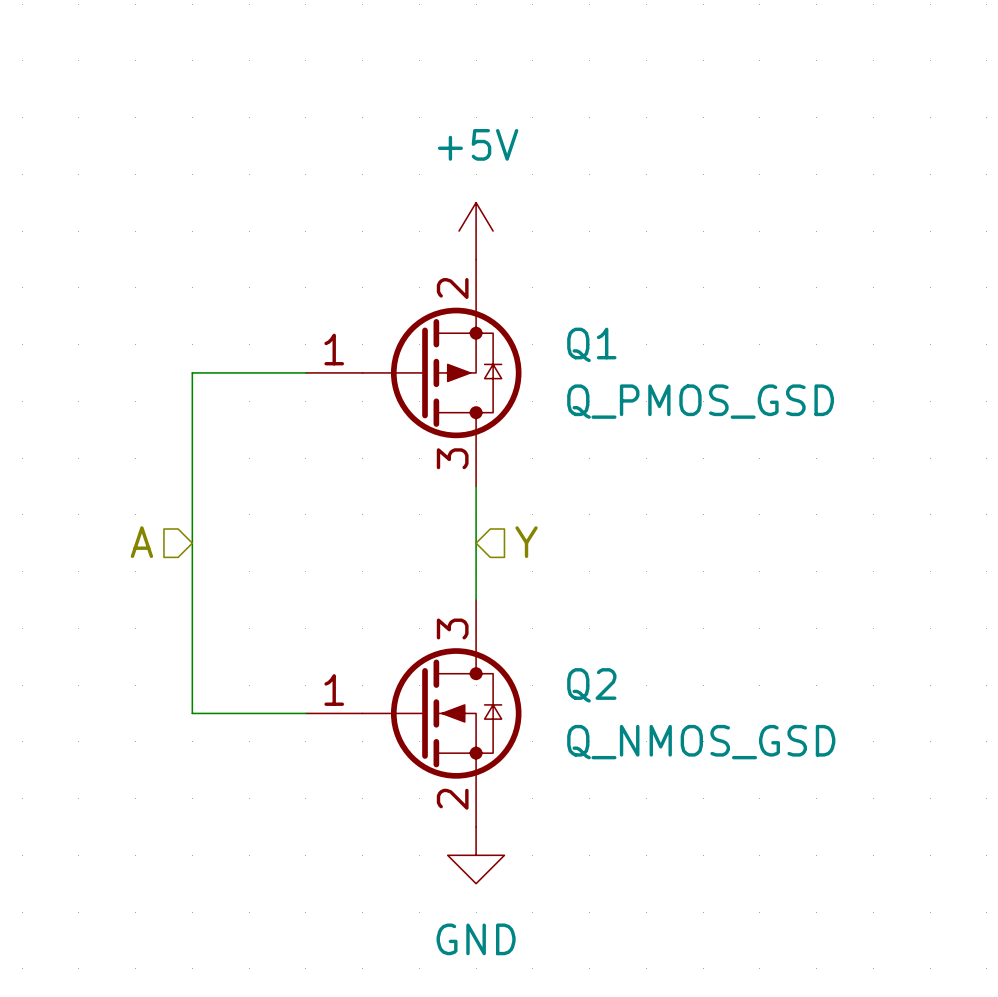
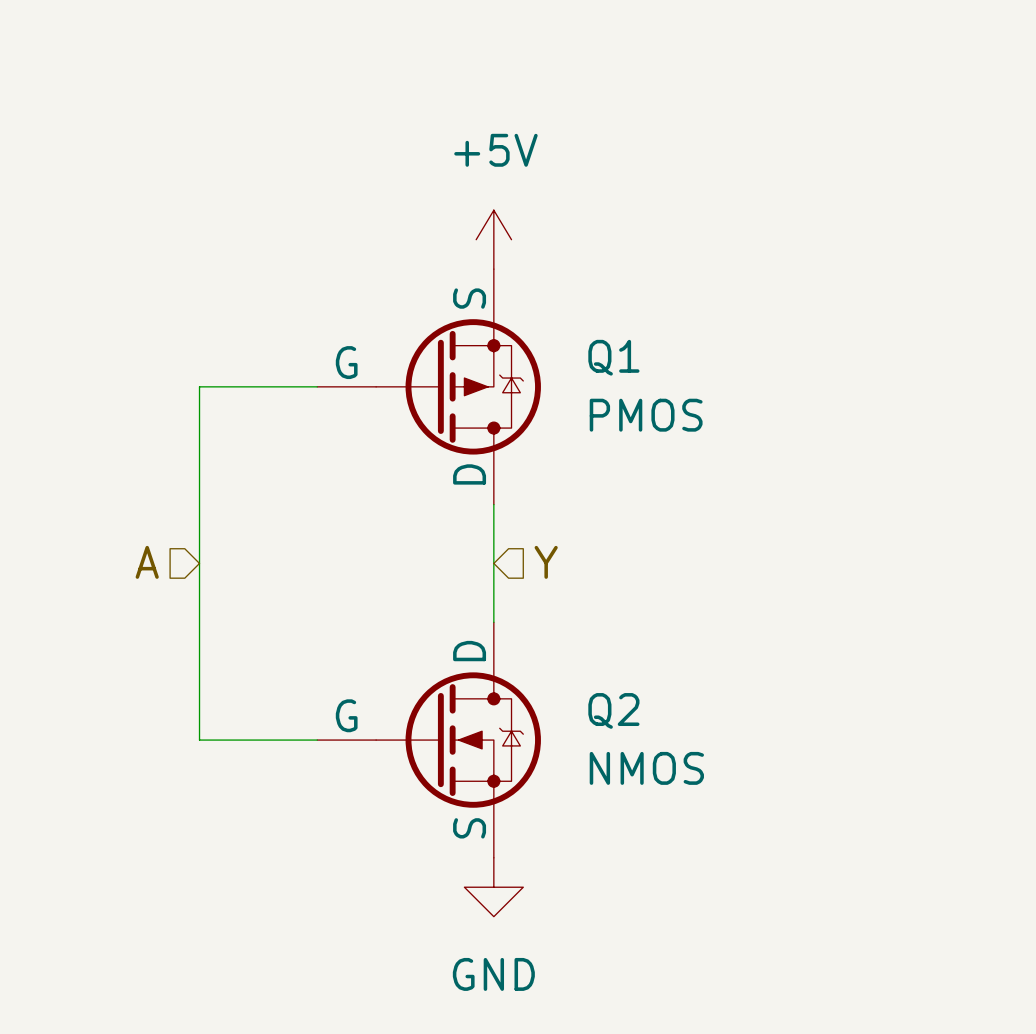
Q1 symbol: [305, 259, 522, 487] -> [317, 269, 541, 505]
Q1 value: Q_PMOS_GSD (700, 401) -> PMOS (646, 415)
Q2 symbol: [305, 599, 522, 827] -> [317, 622, 541, 858]
Q2 value: Q_NMOS_GSD (701, 742) -> NMOS (646, 768)

